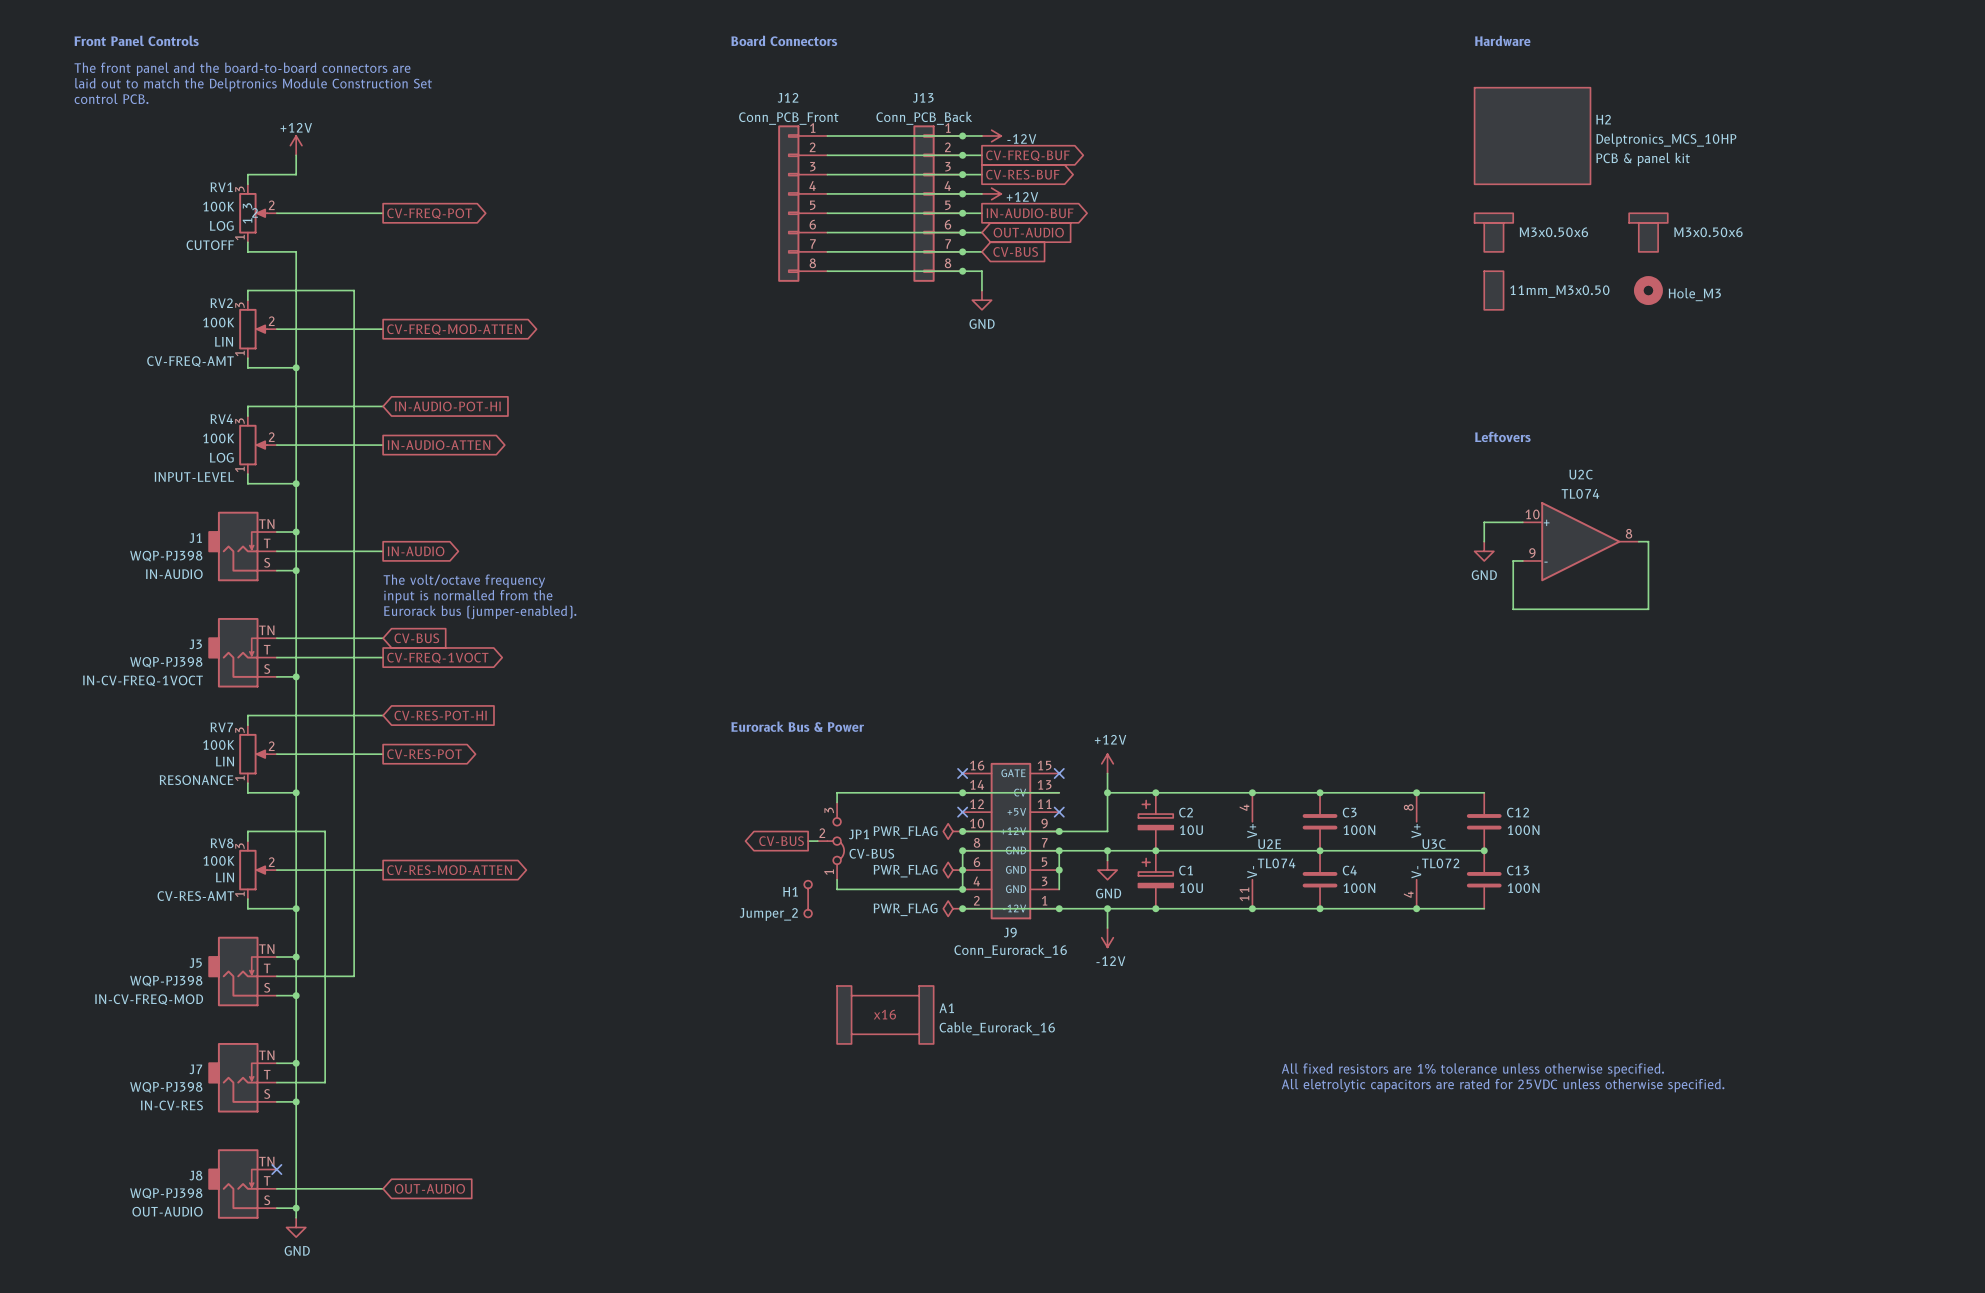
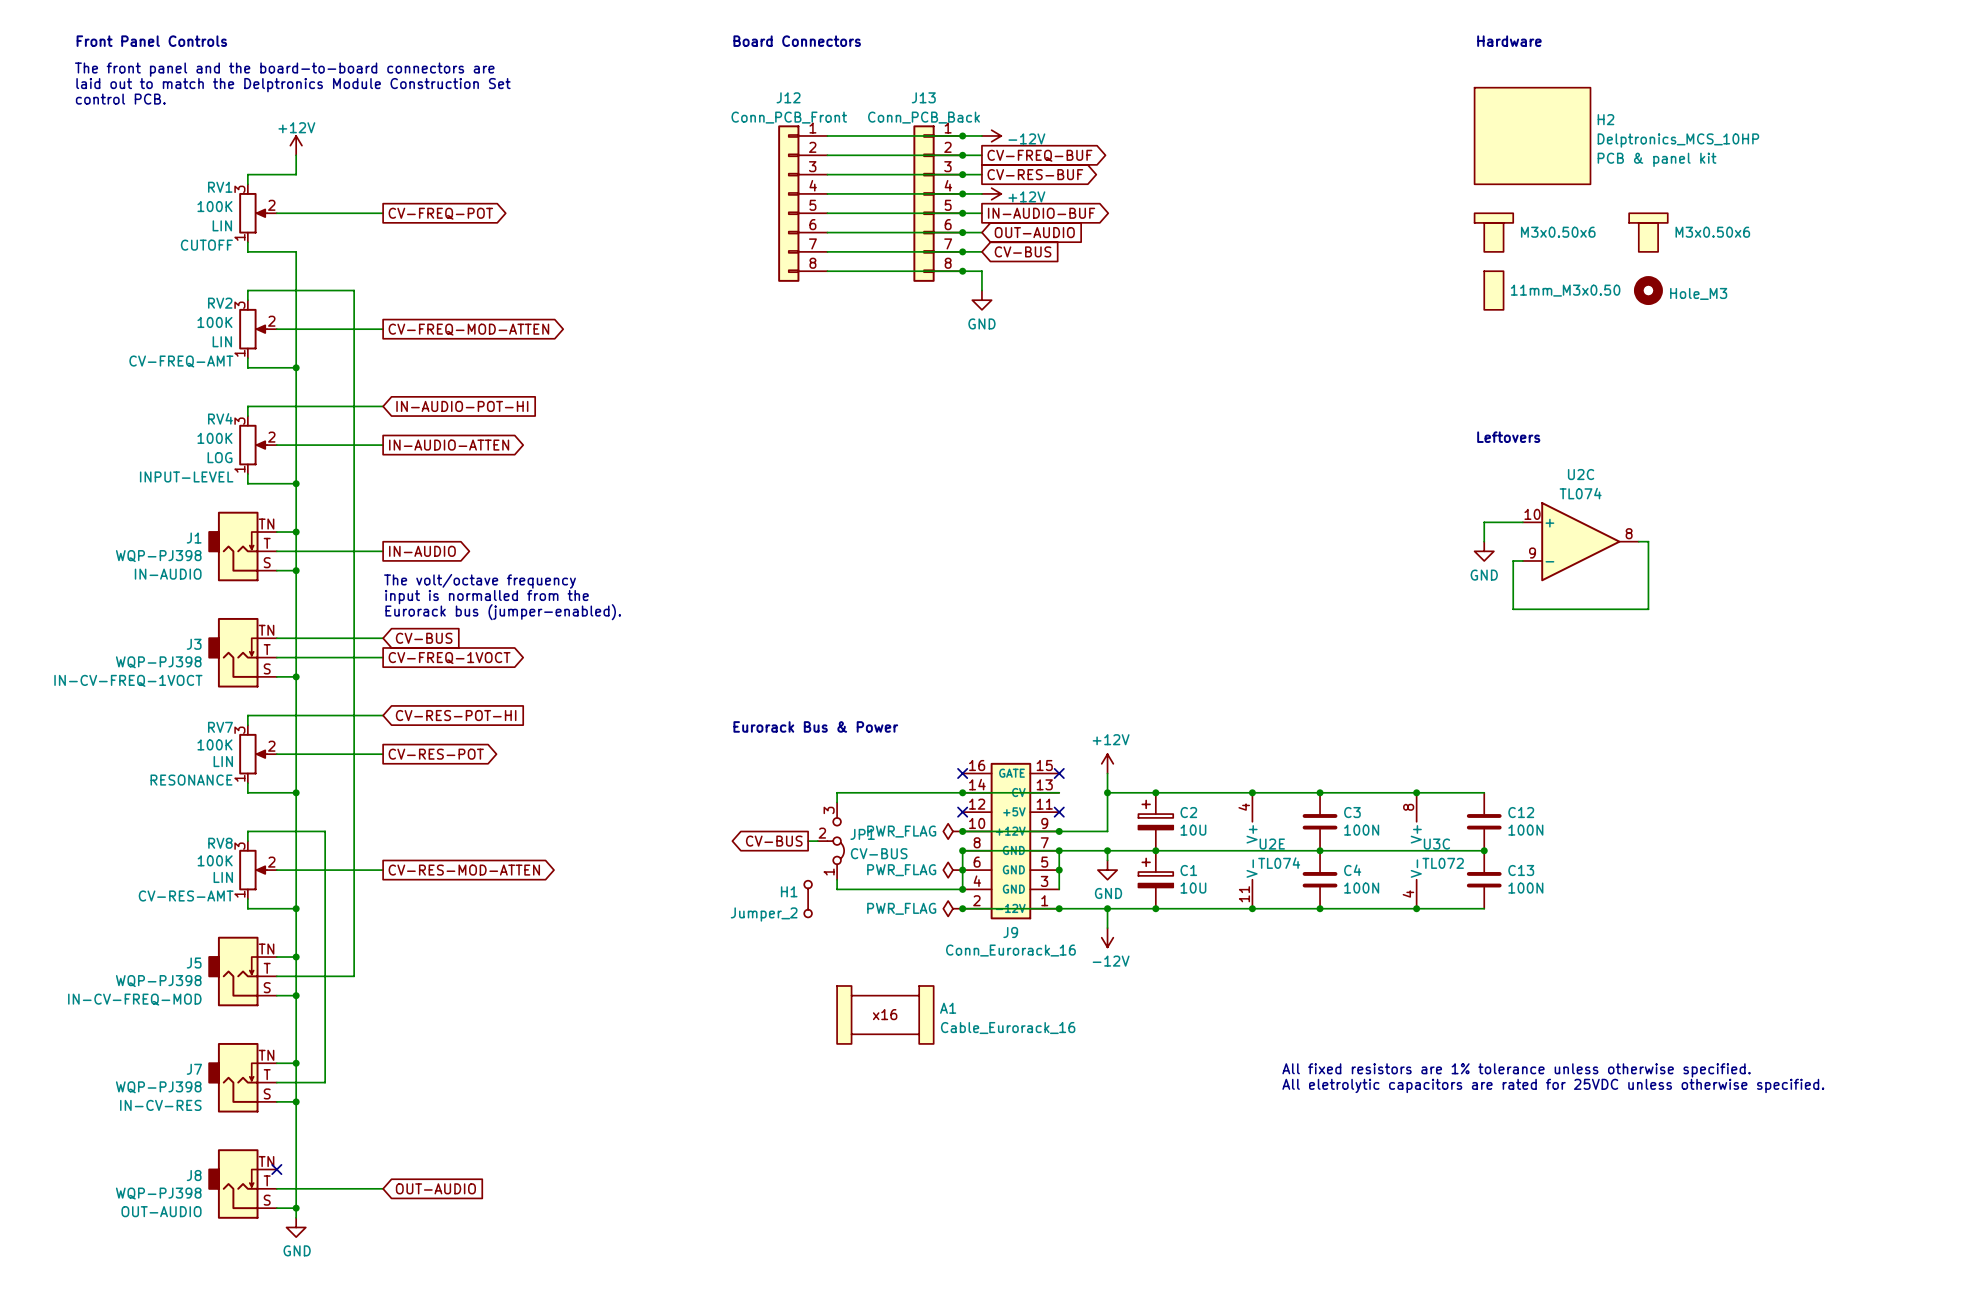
RV1 pin name: 3 (247, 205) -> none
RV1 pin name: 2 (255, 212) -> none
RV1 pin name: 1 (247, 220) -> none
RV1 text: LOG (221, 225) -> LIN (222, 225)

